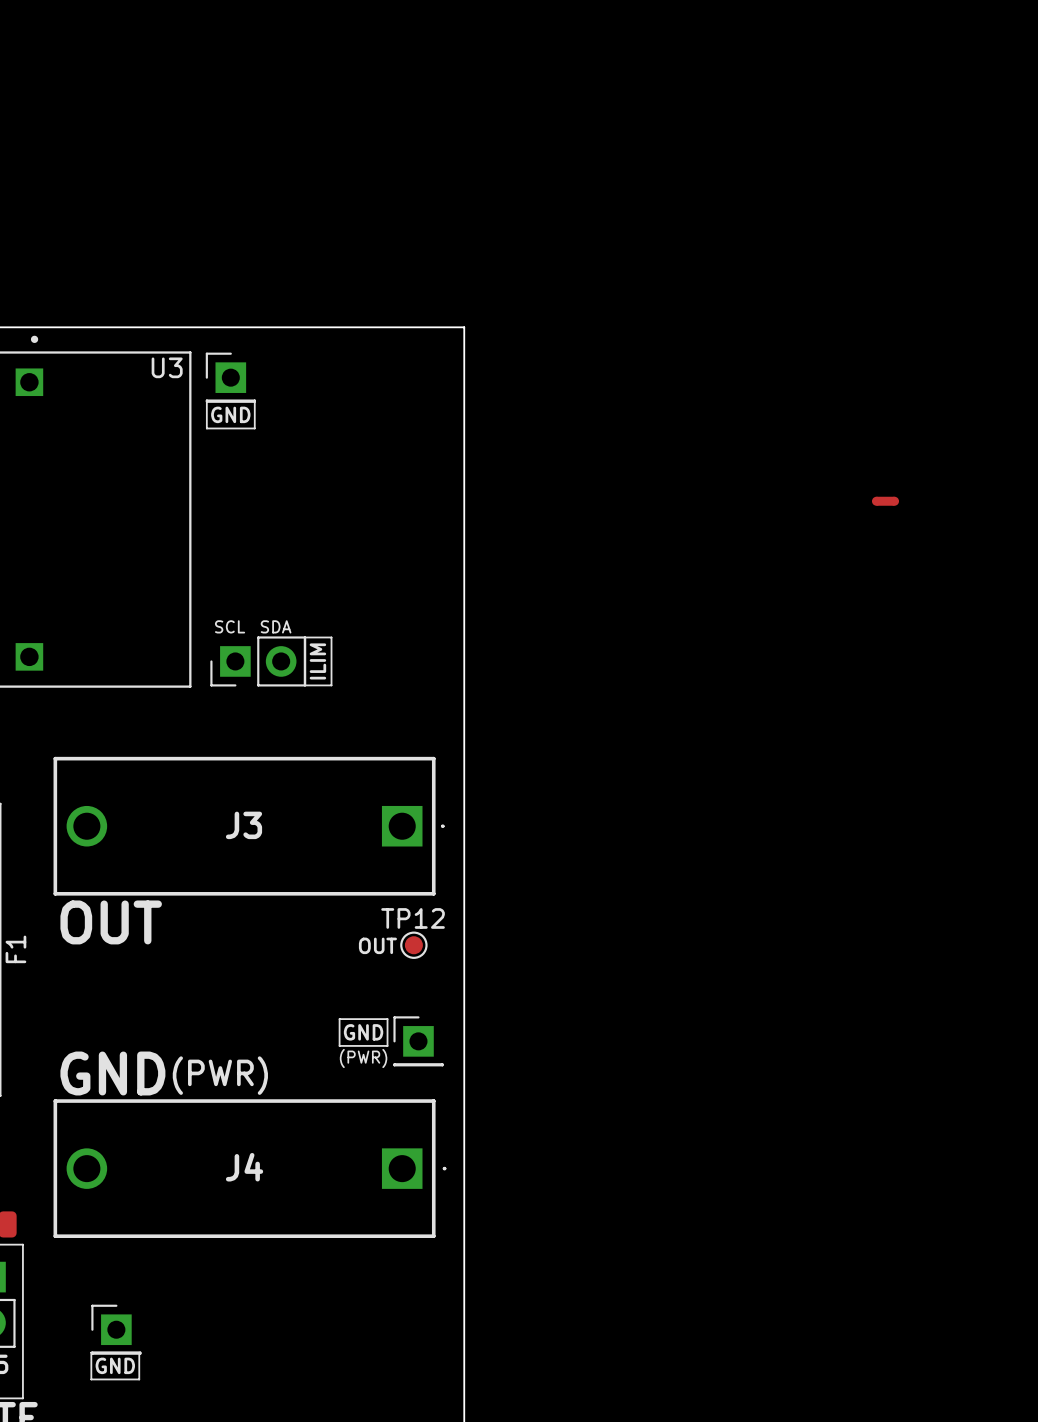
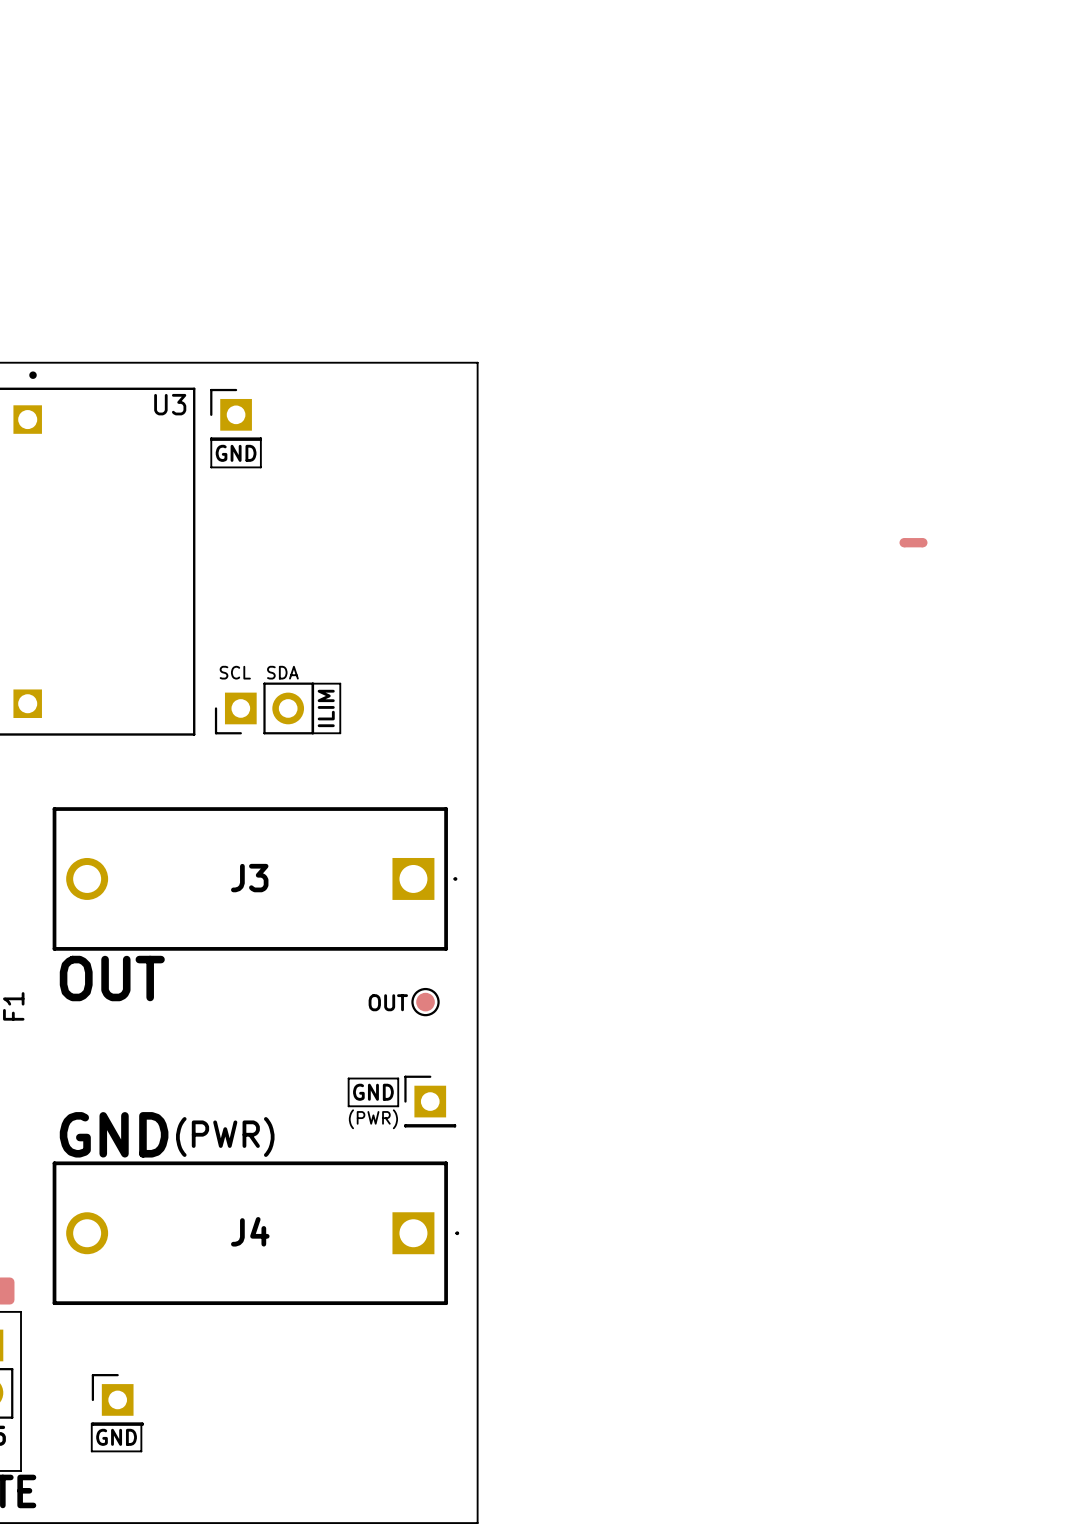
TP12 name: TP12 (413, 918) -> none

